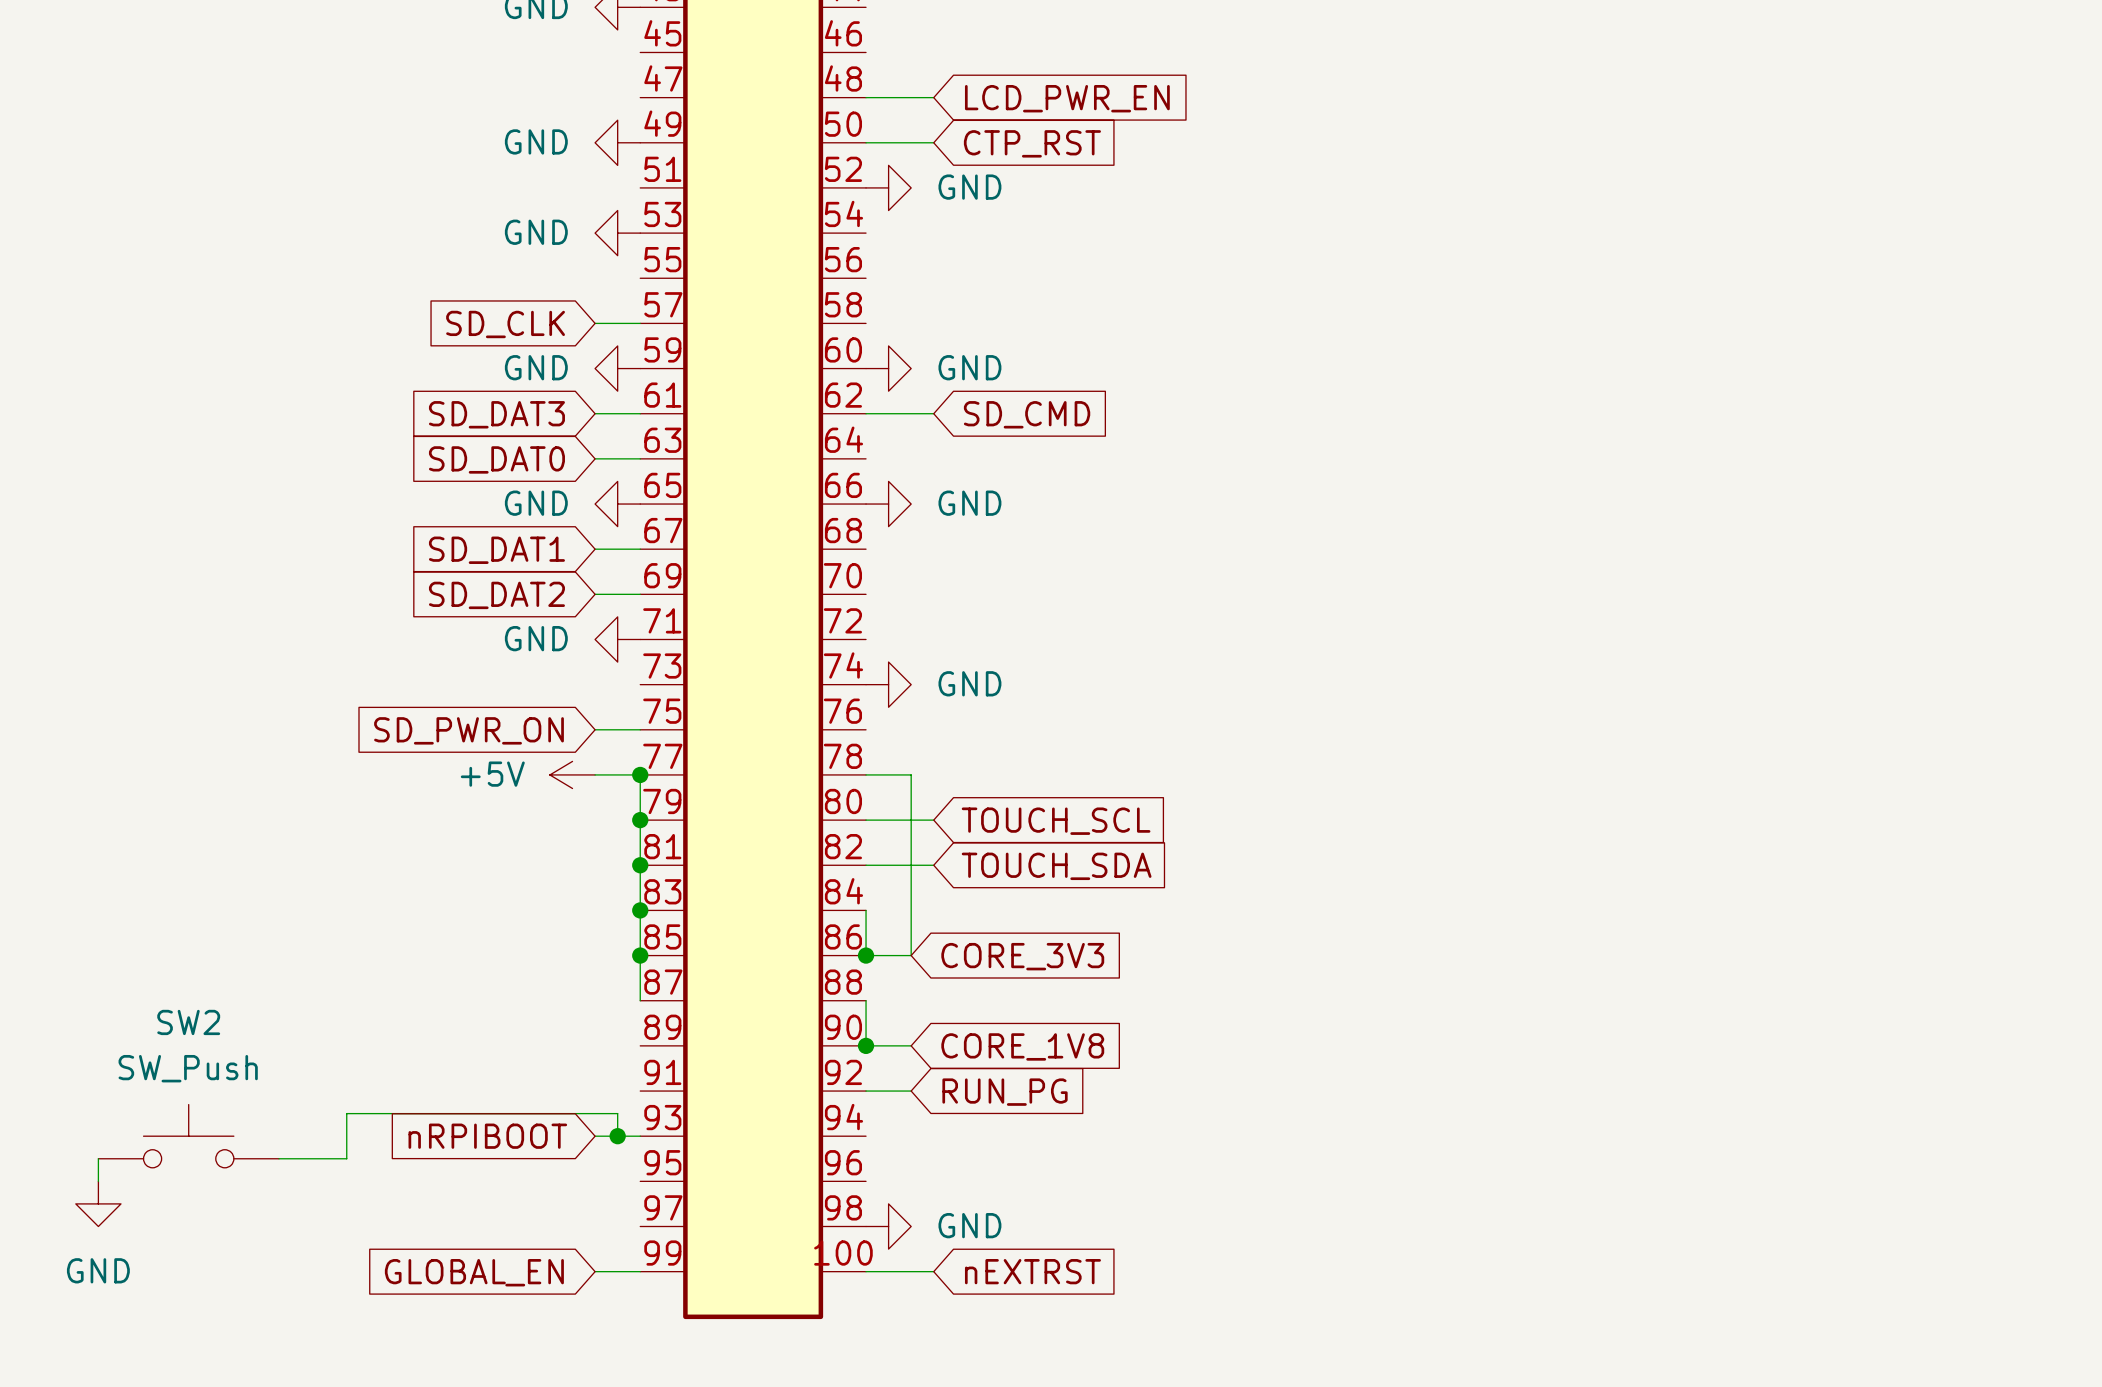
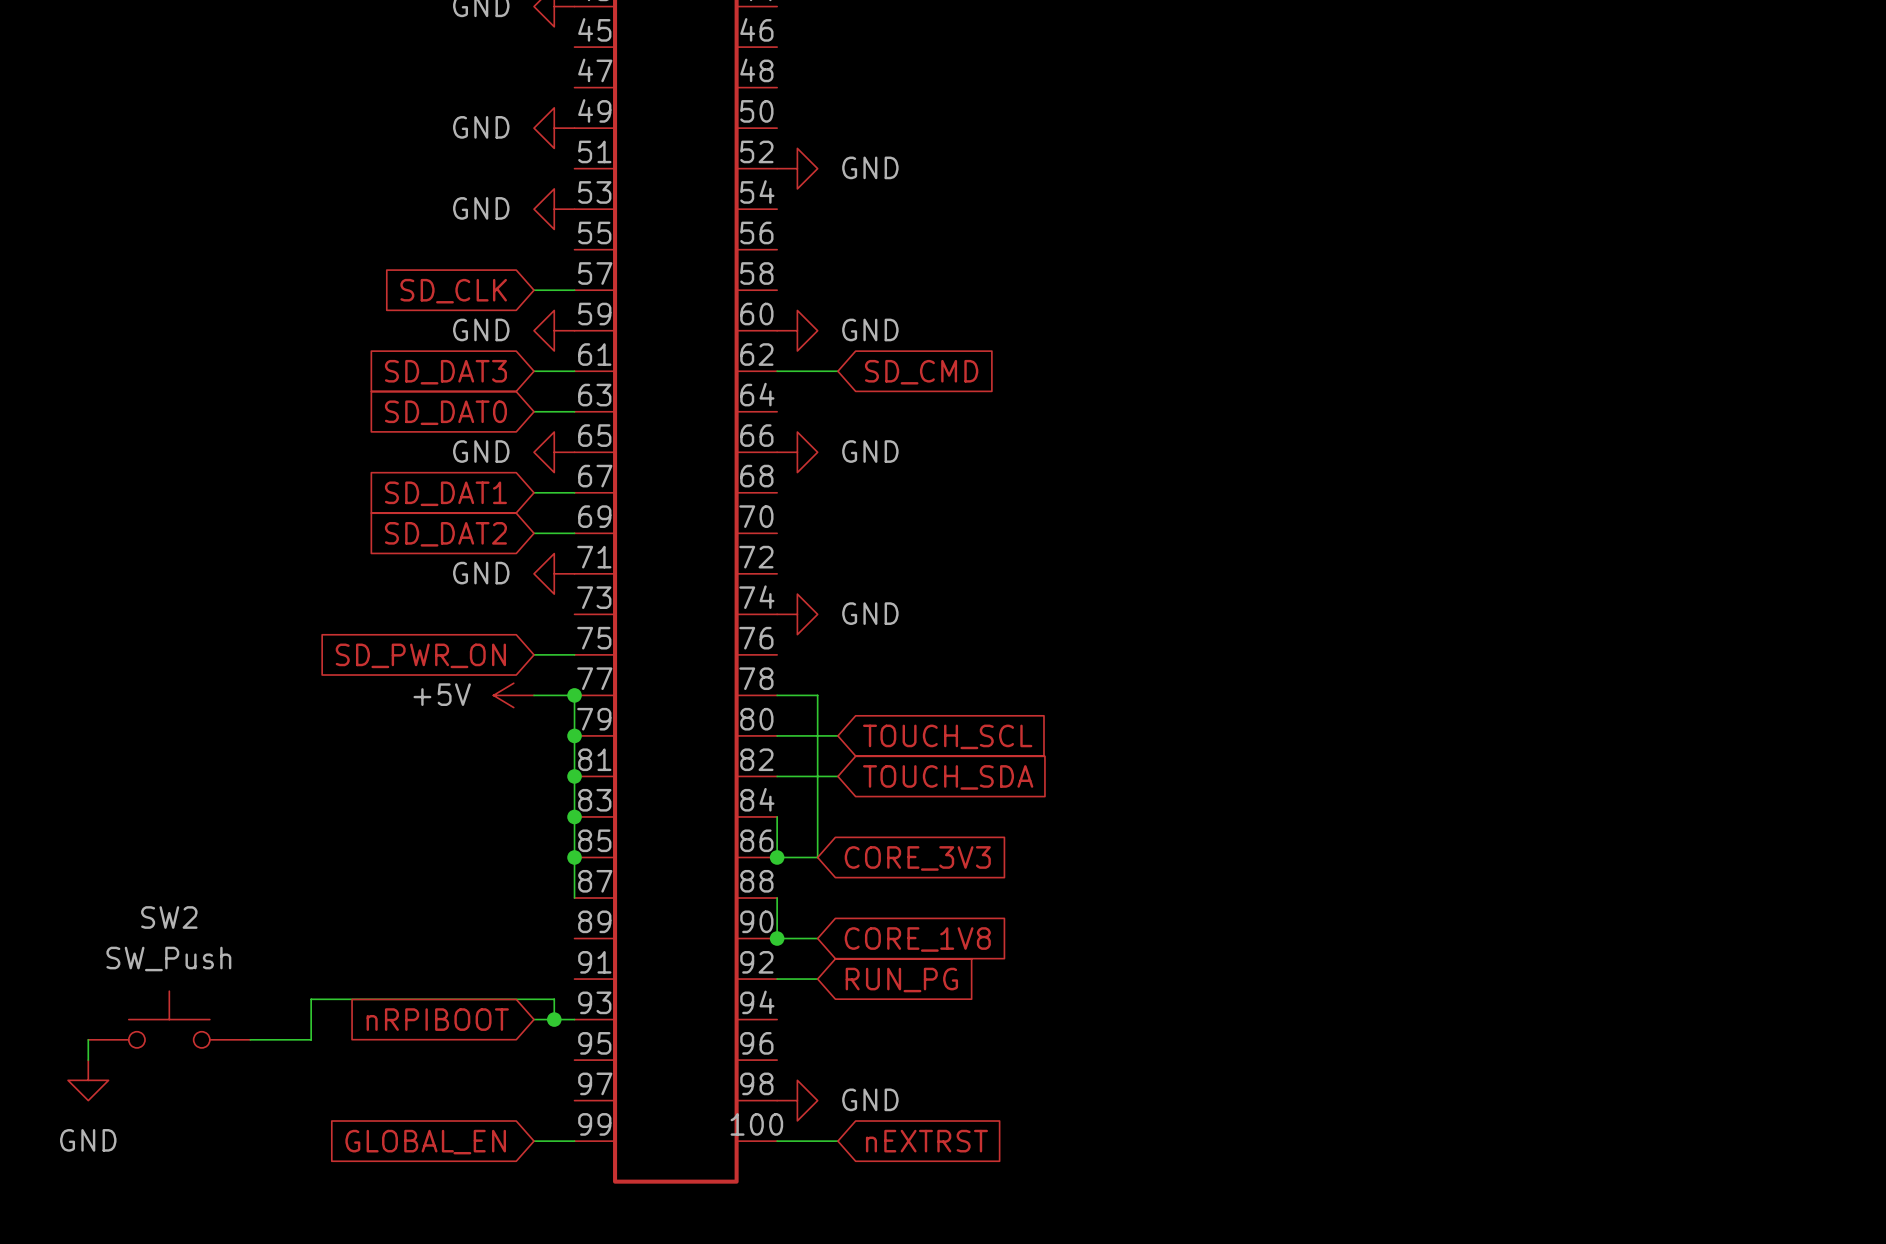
wire: (866, 97) (933, 97) -> none
global label: LCD_PWR_EN (1067, 98) -> none
wire: (866, 142) (933, 142) -> none
global label: CTP_RST (1032, 143) -> none

